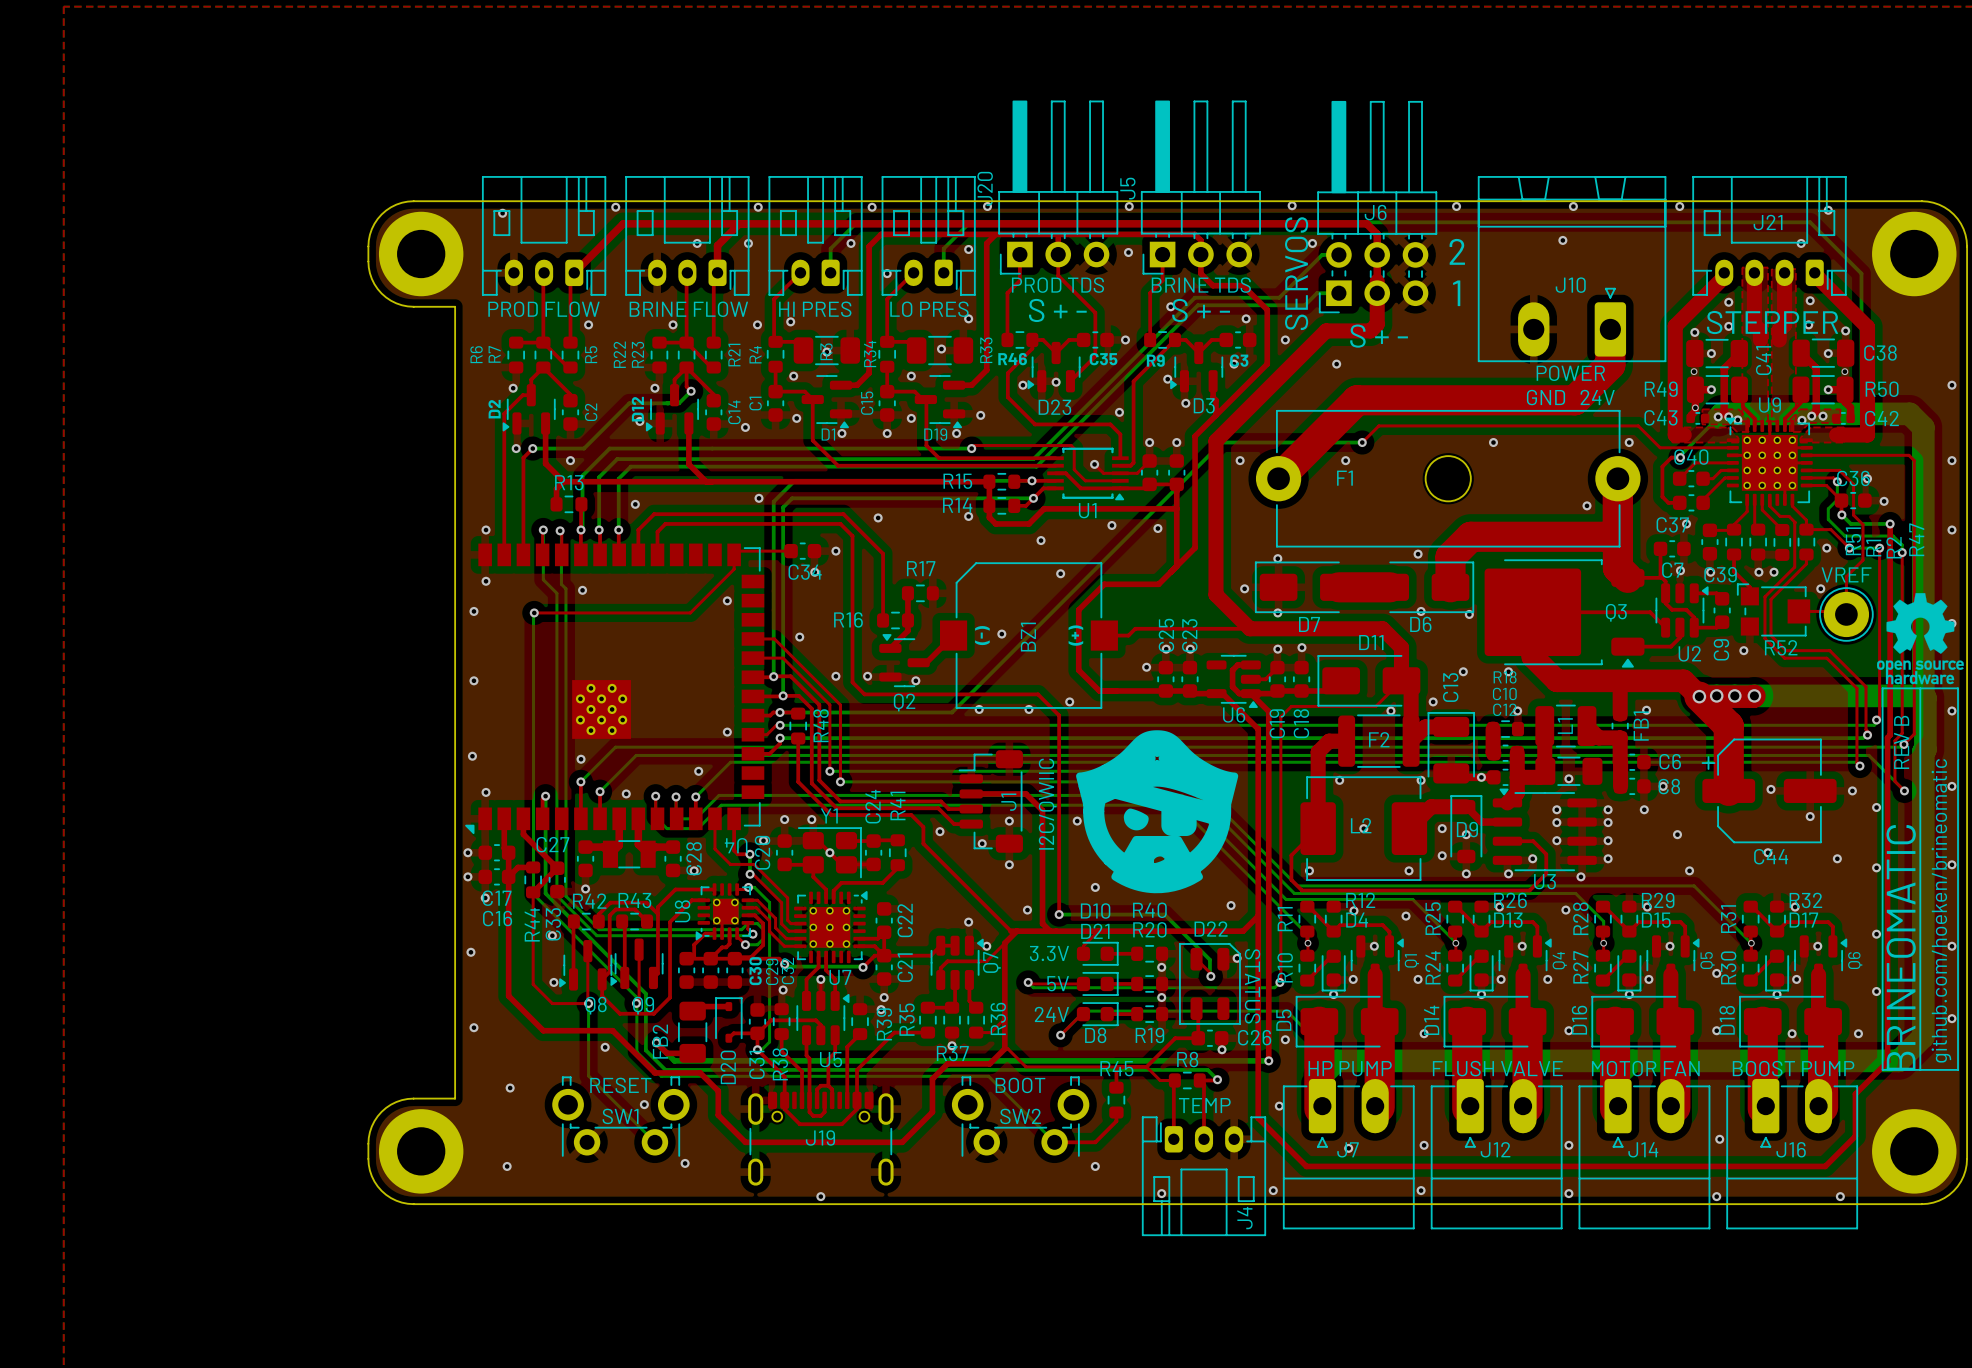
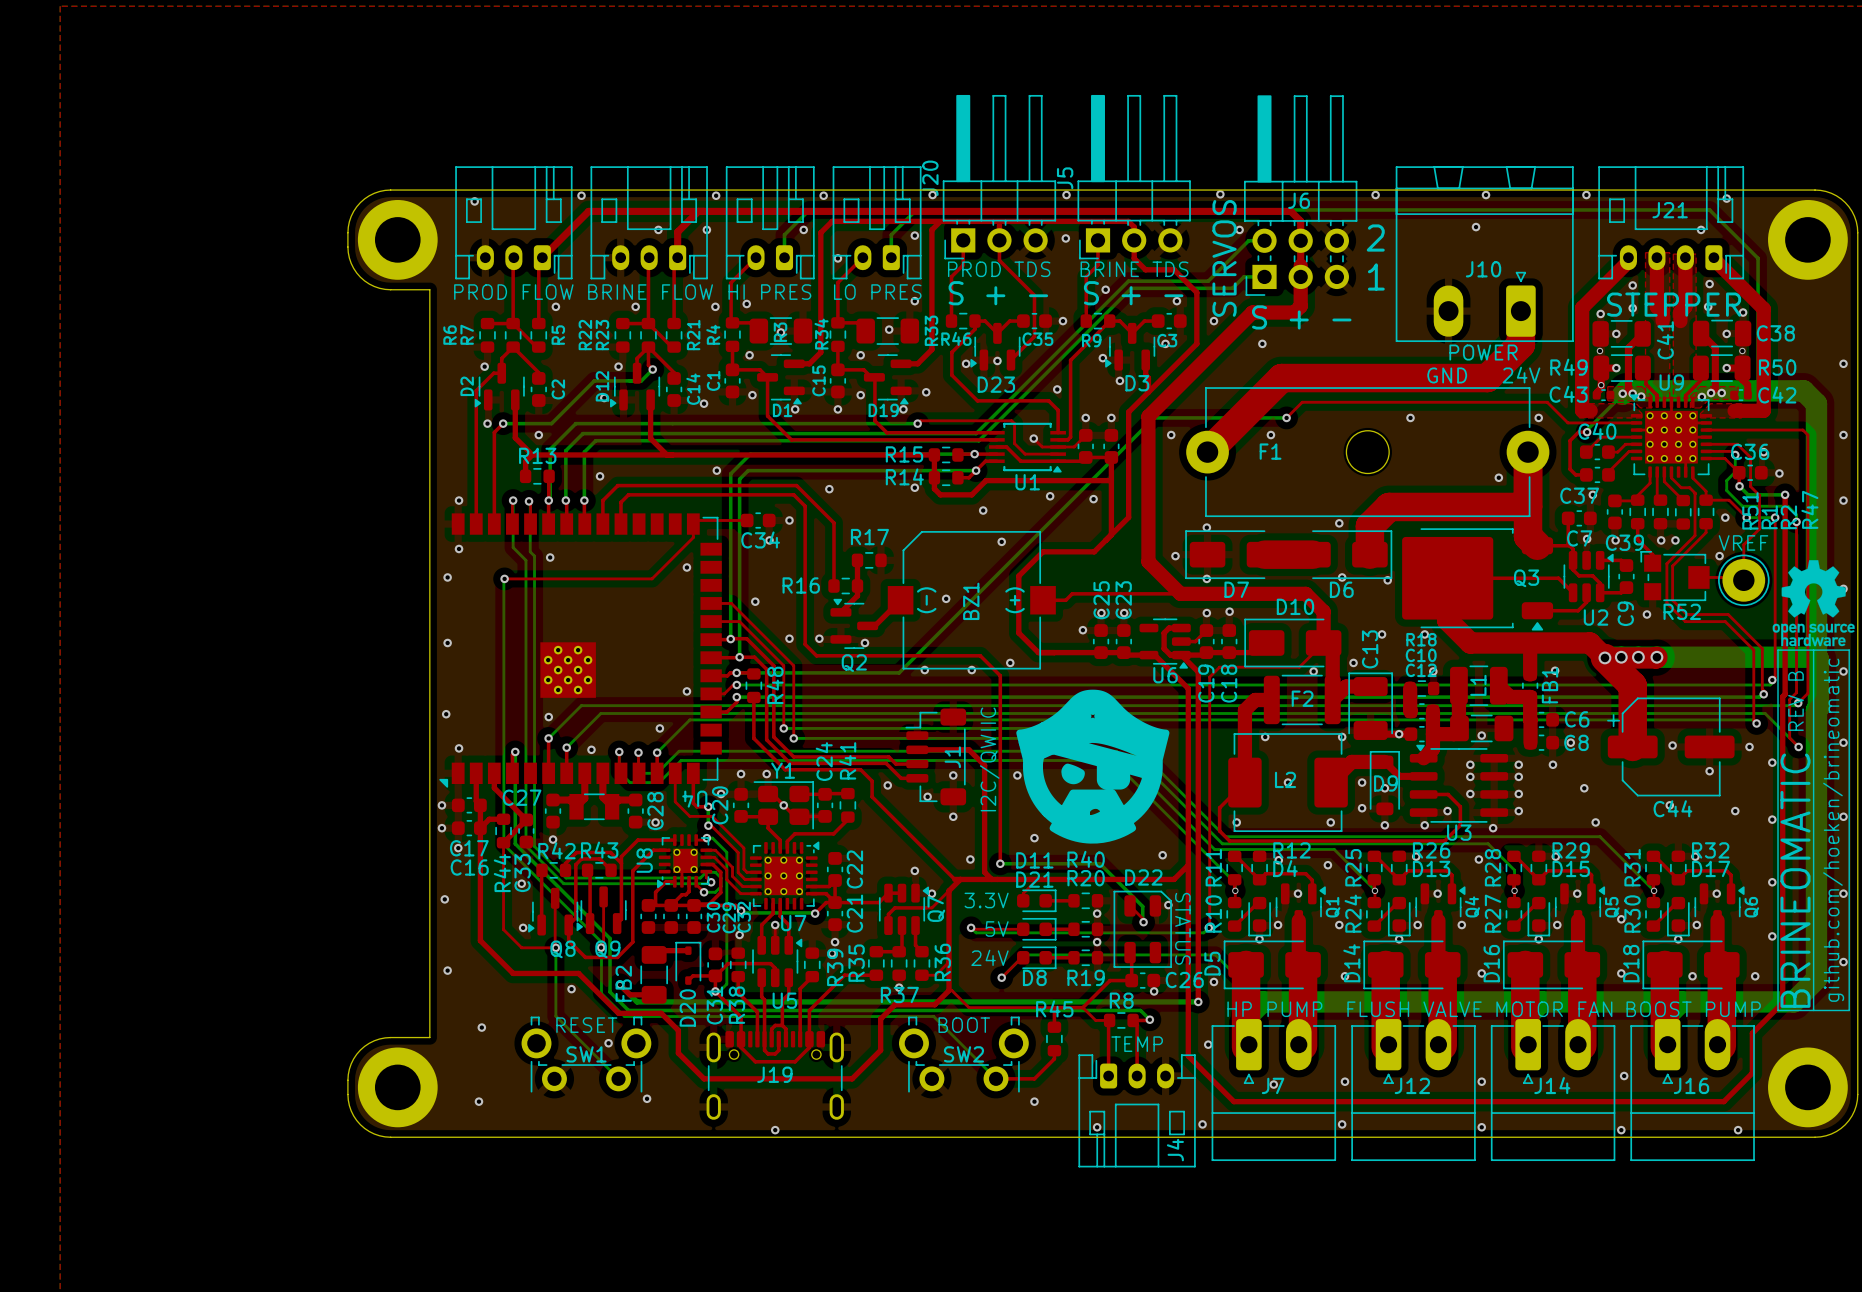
D11 name: D11 (1371, 642) -> D10 (1295, 606)
D10 name: D10 (1095, 911) -> D11 (1034, 860)

